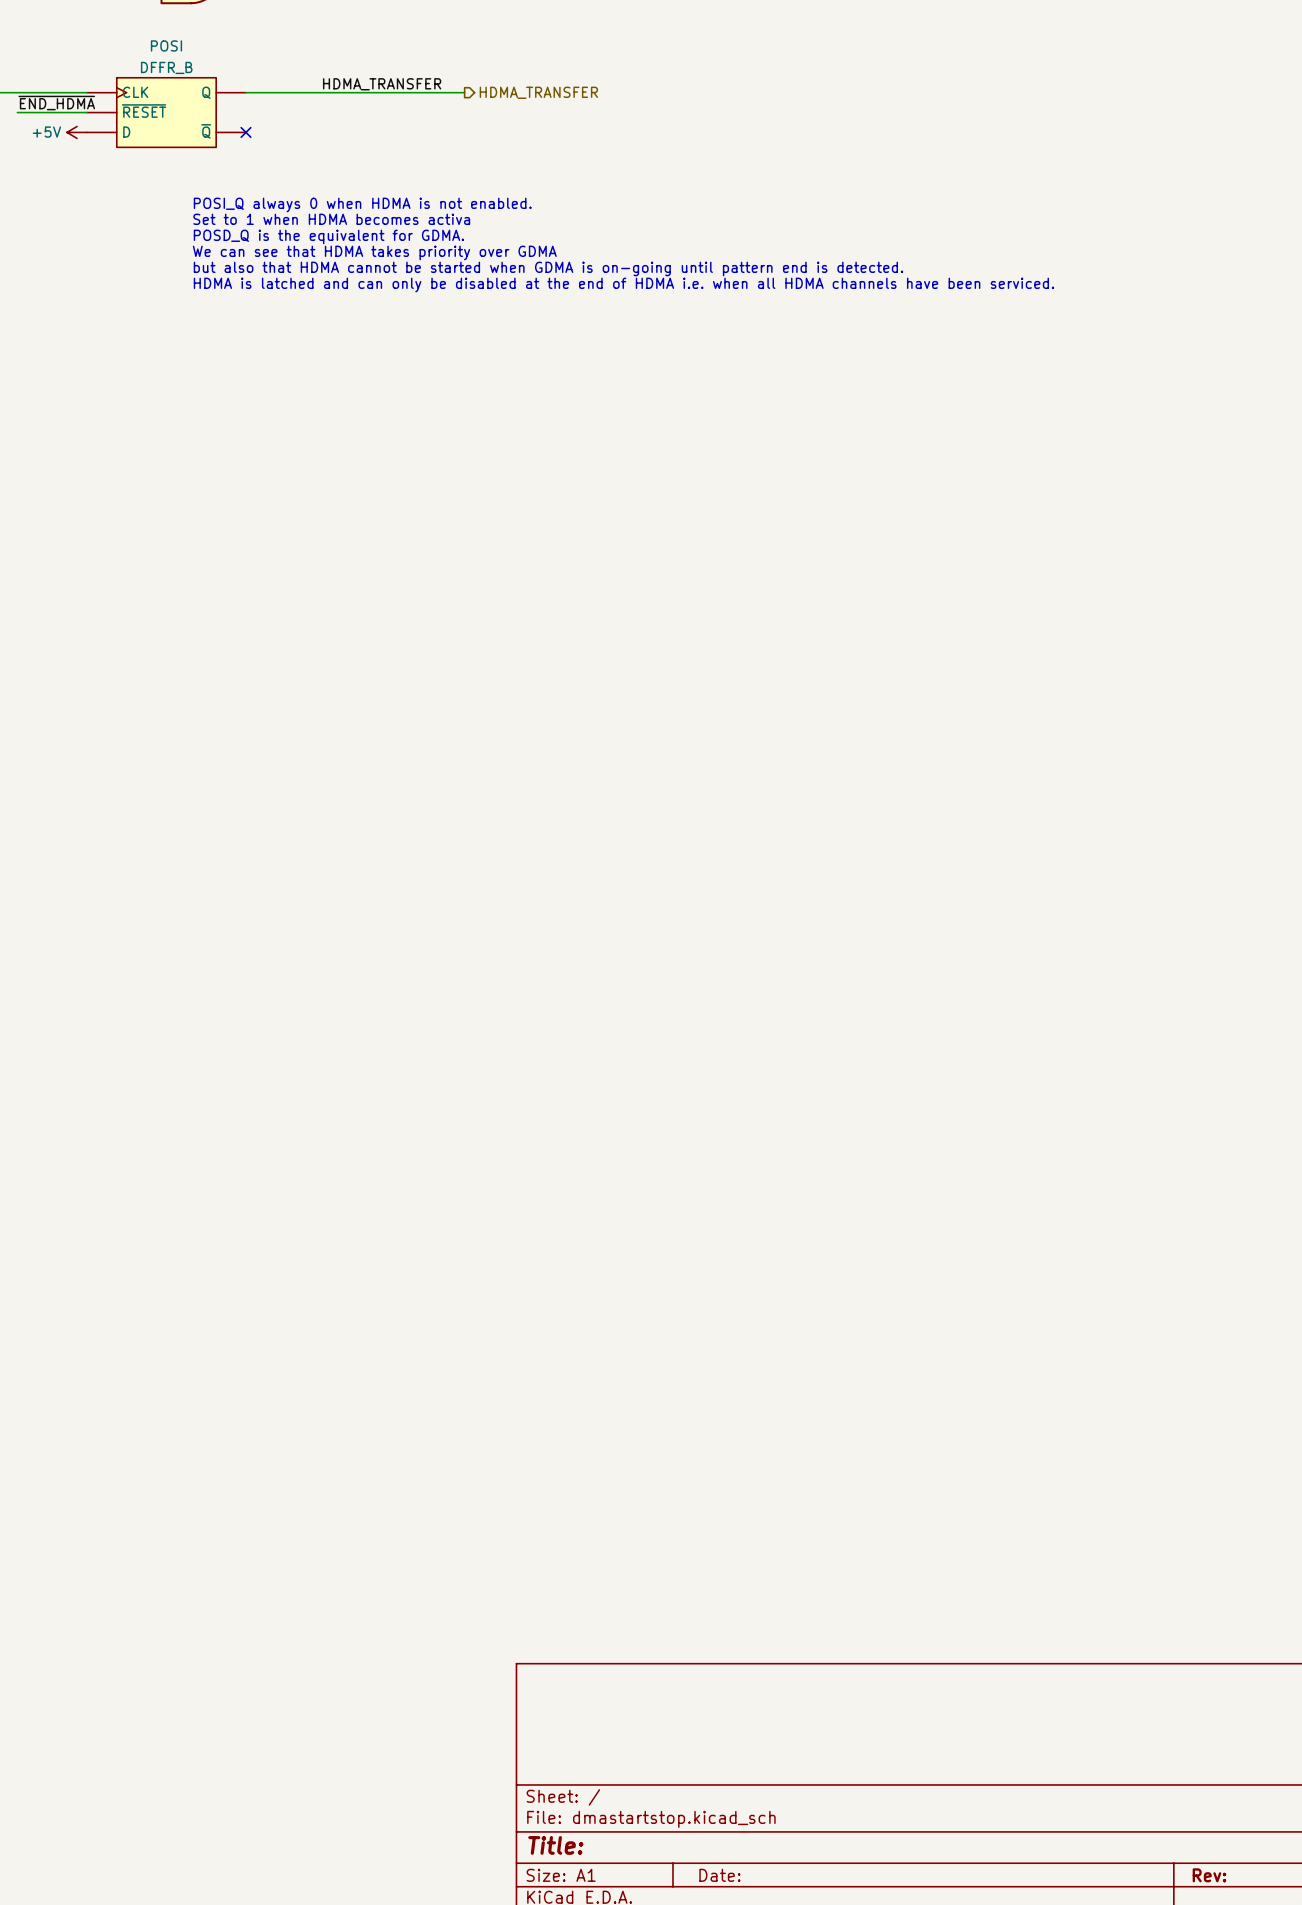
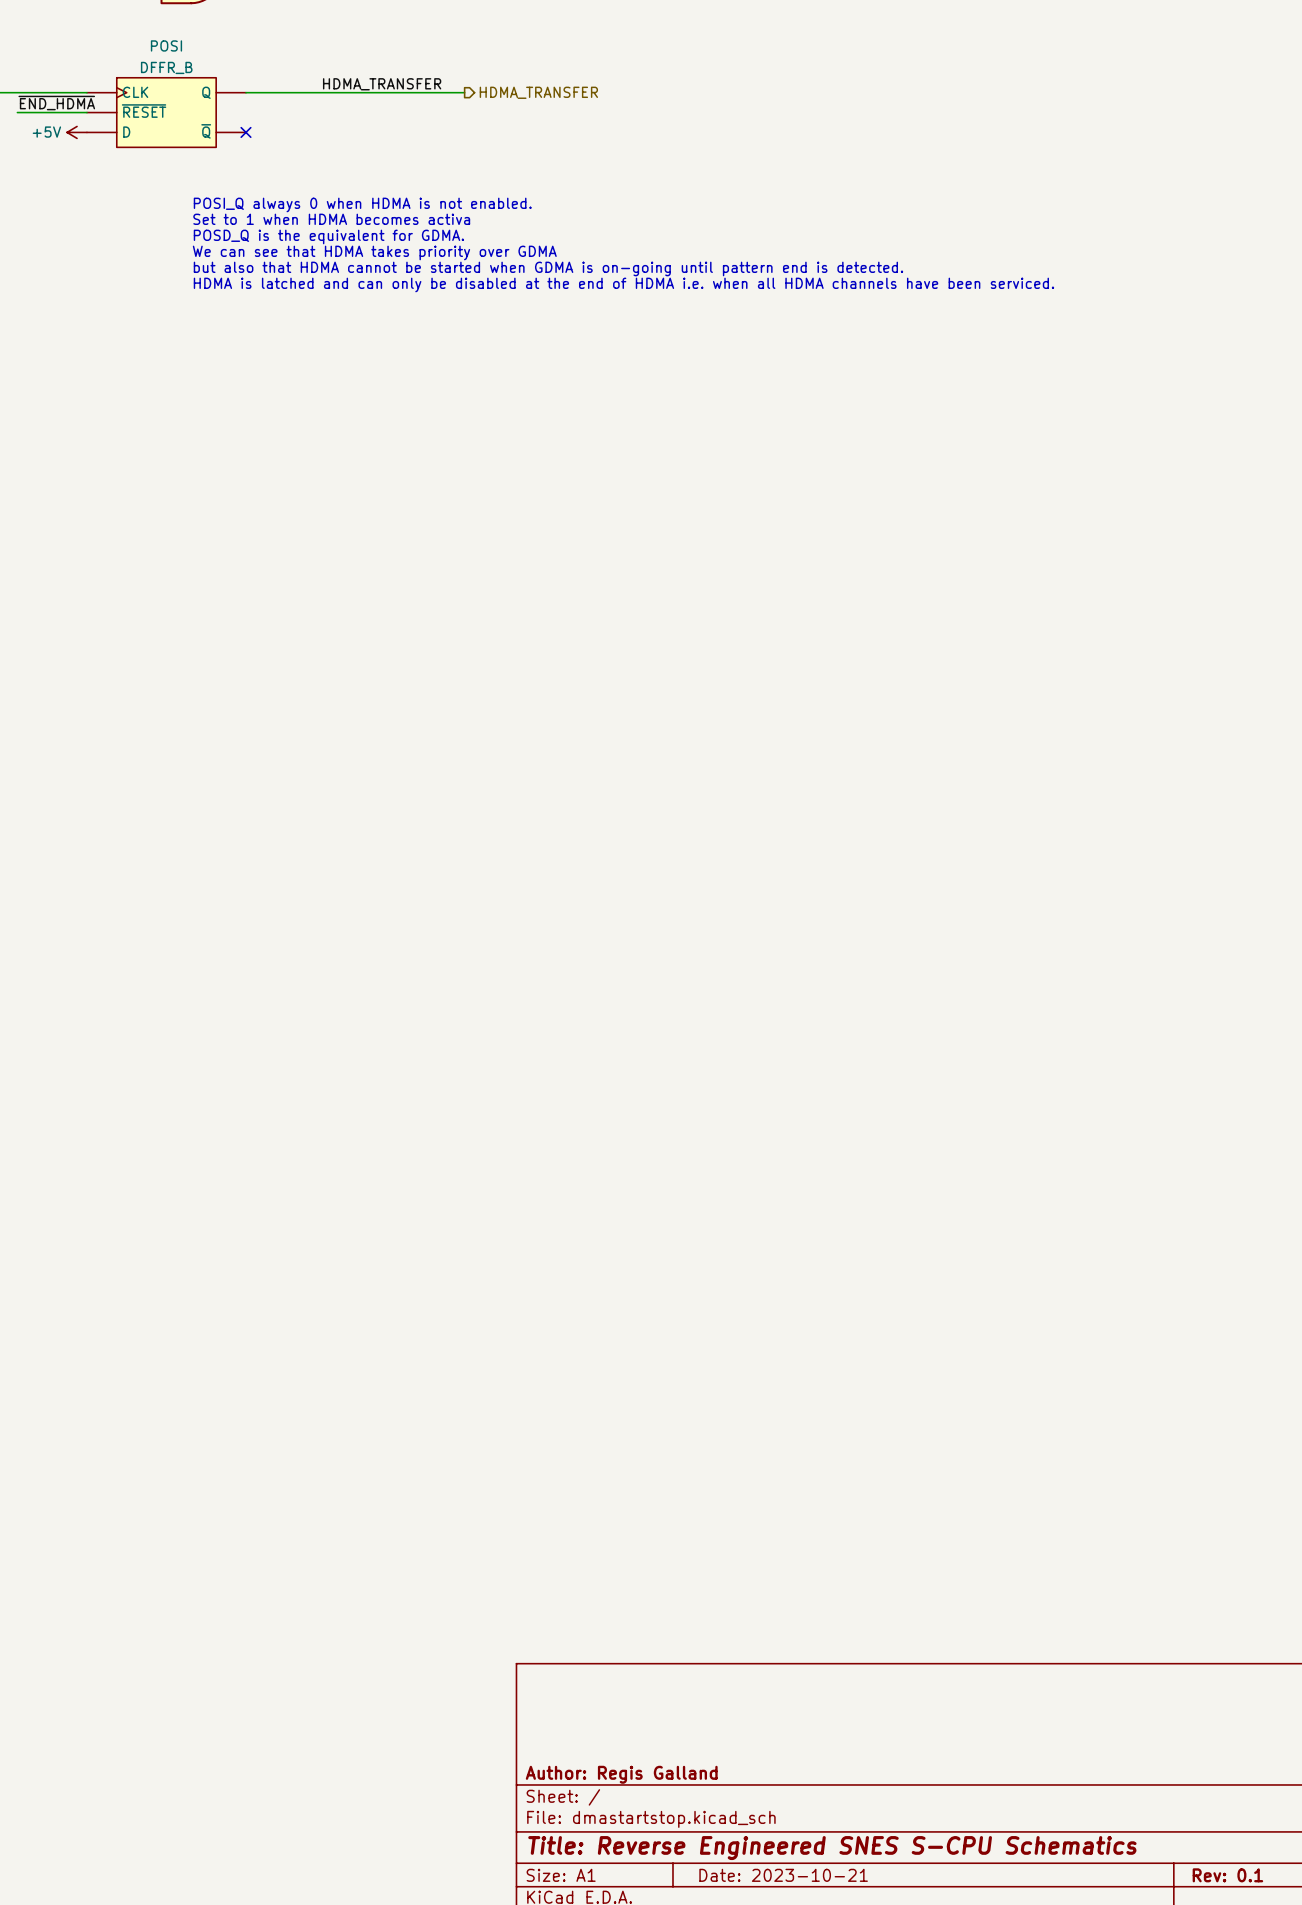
title block: none -> Author: Regis Galland (621, 1774)
title block: Title: (555, 1845) -> Title: Reverse Engineered SNES S-CPU Schematics (832, 1848)
title block: Date: (719, 1875) -> Date: 2023-10-21 (783, 1875)
title block: Rev: (1209, 1875) -> Rev: 0.1 (1227, 1875)

